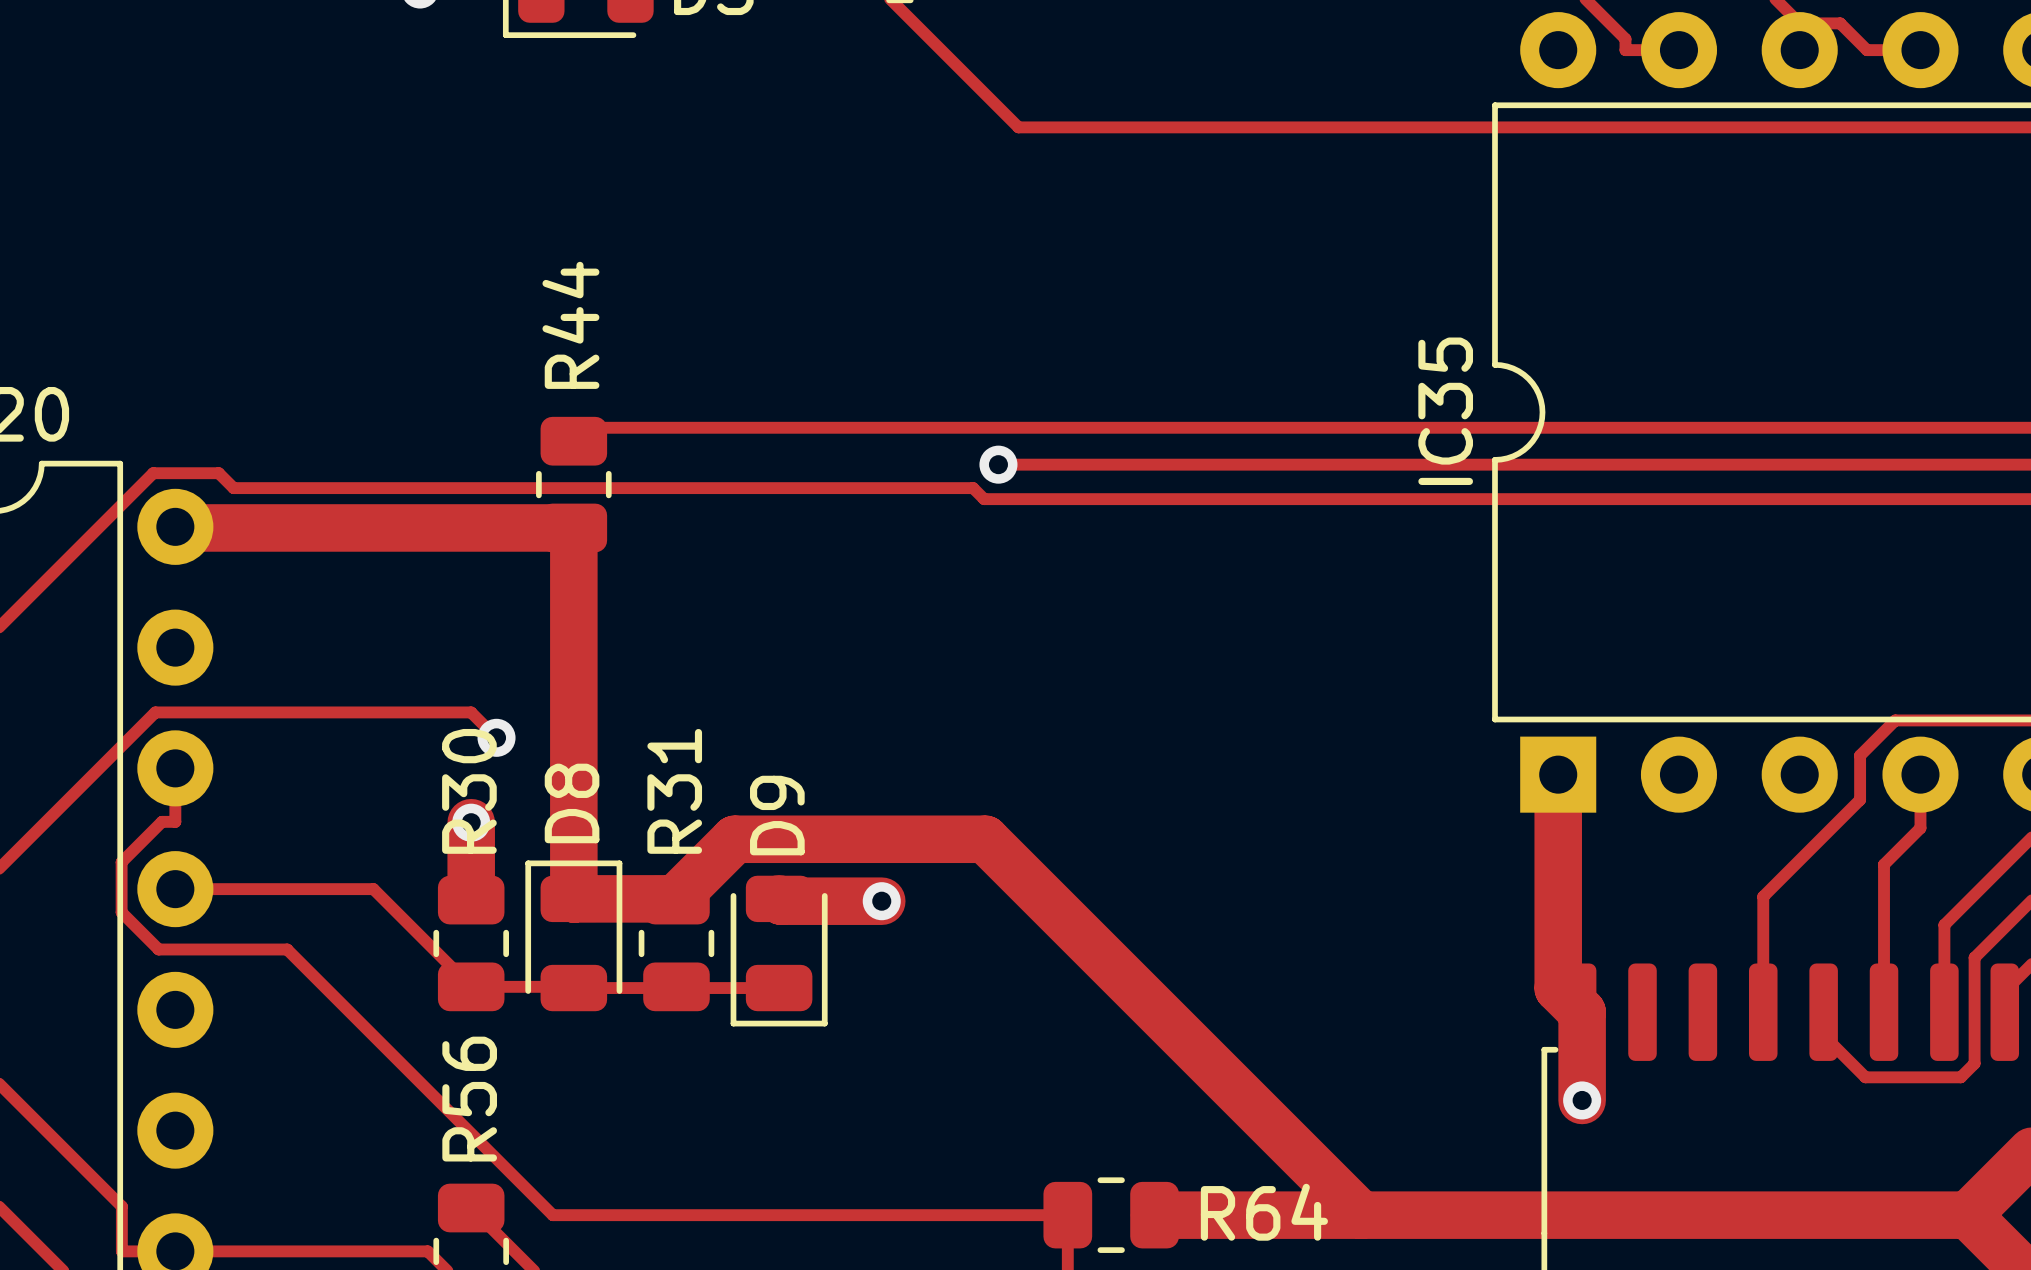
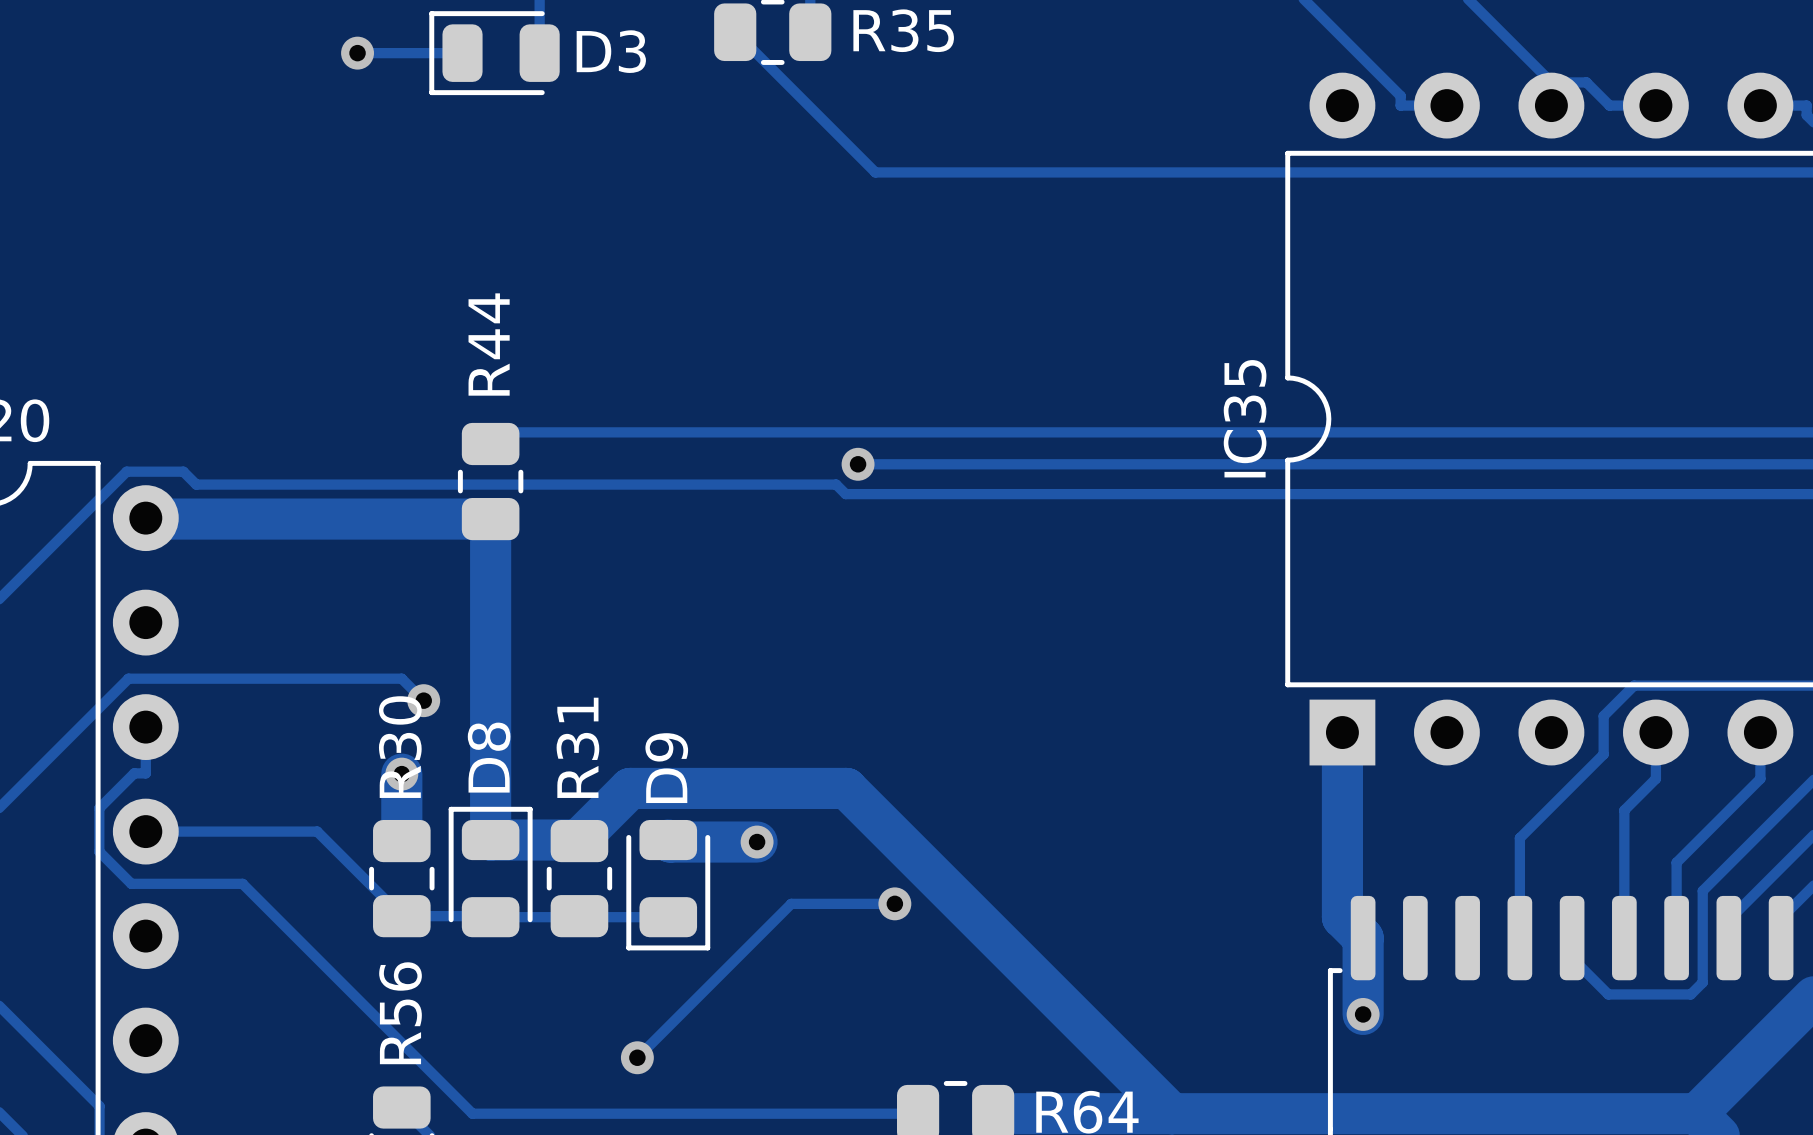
track: none -> (894, 903) (791, 903) (637, 1057)
via: none -> (894, 903)
via: none -> (637, 1057)

